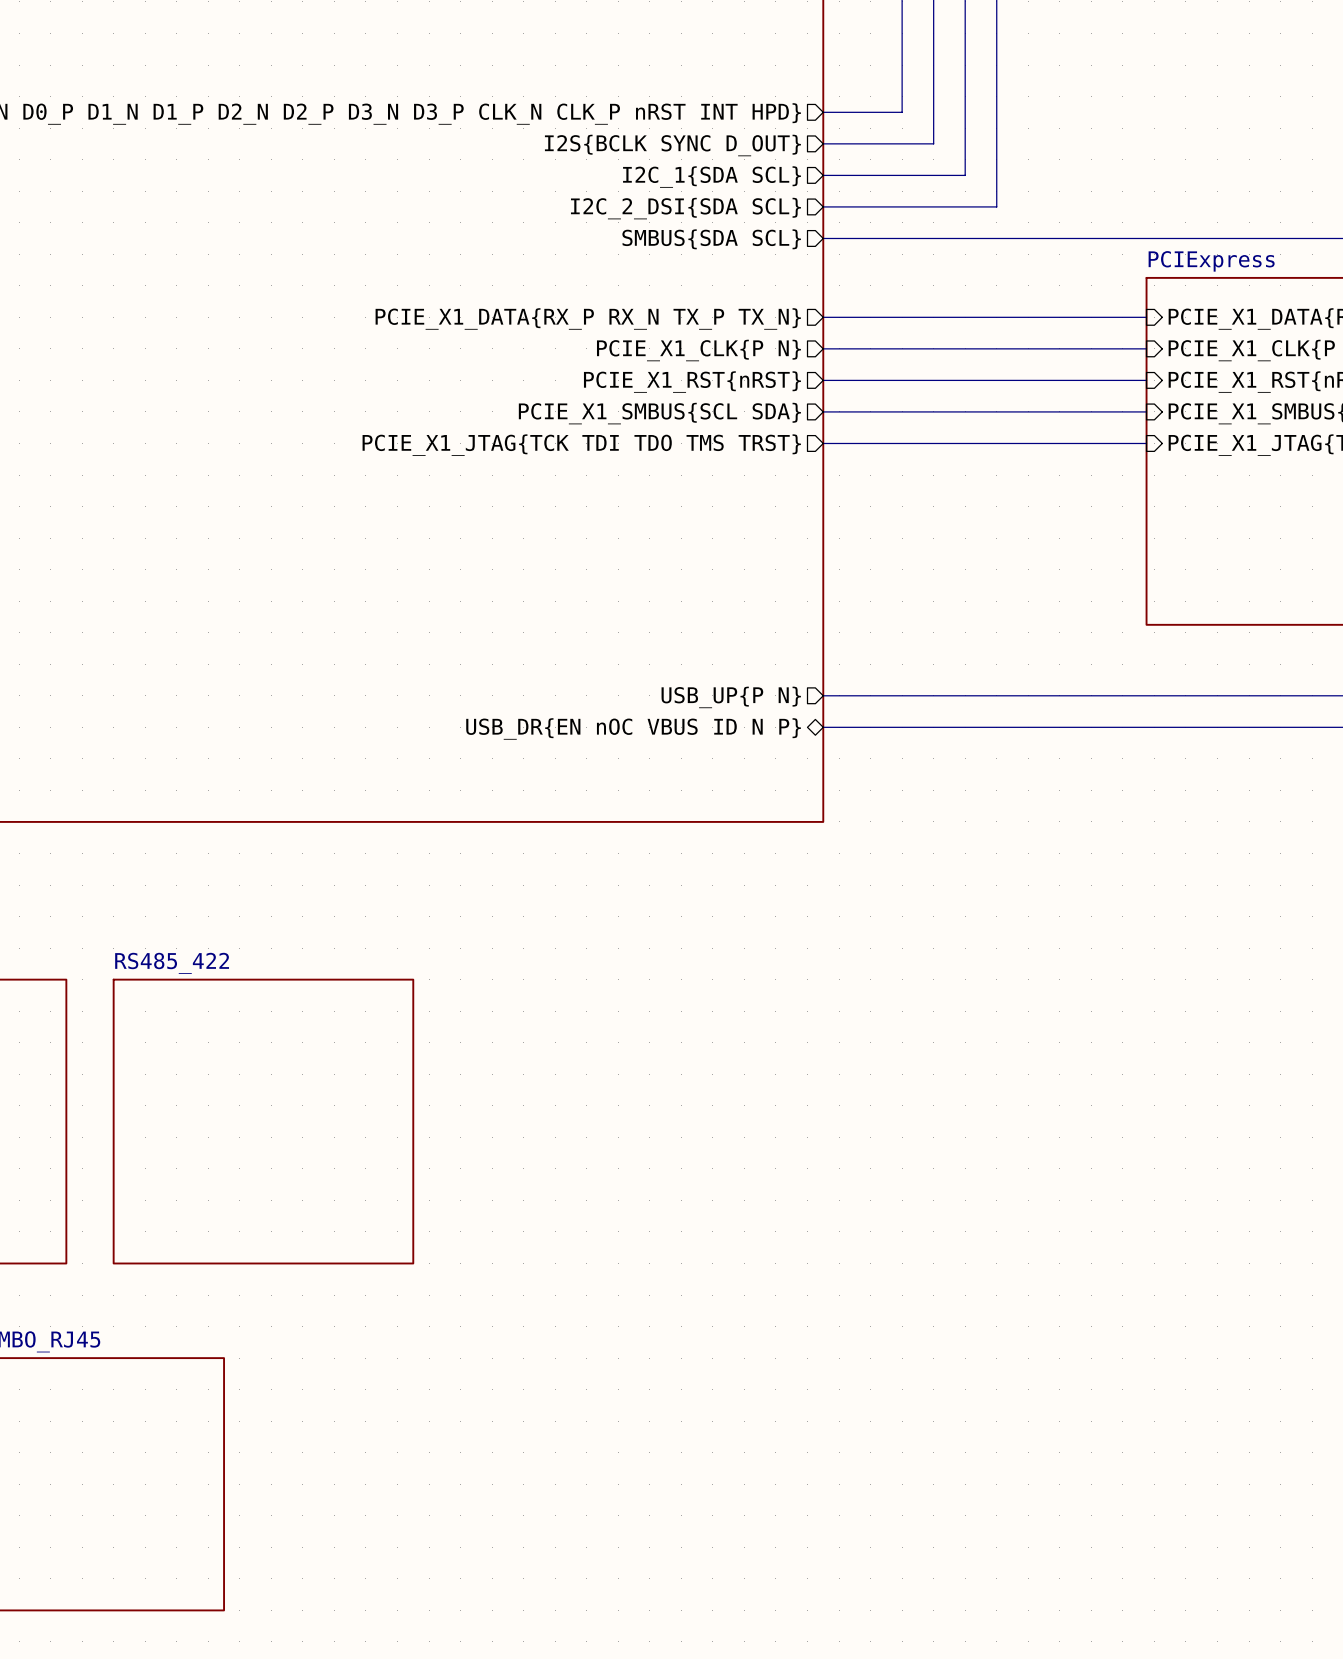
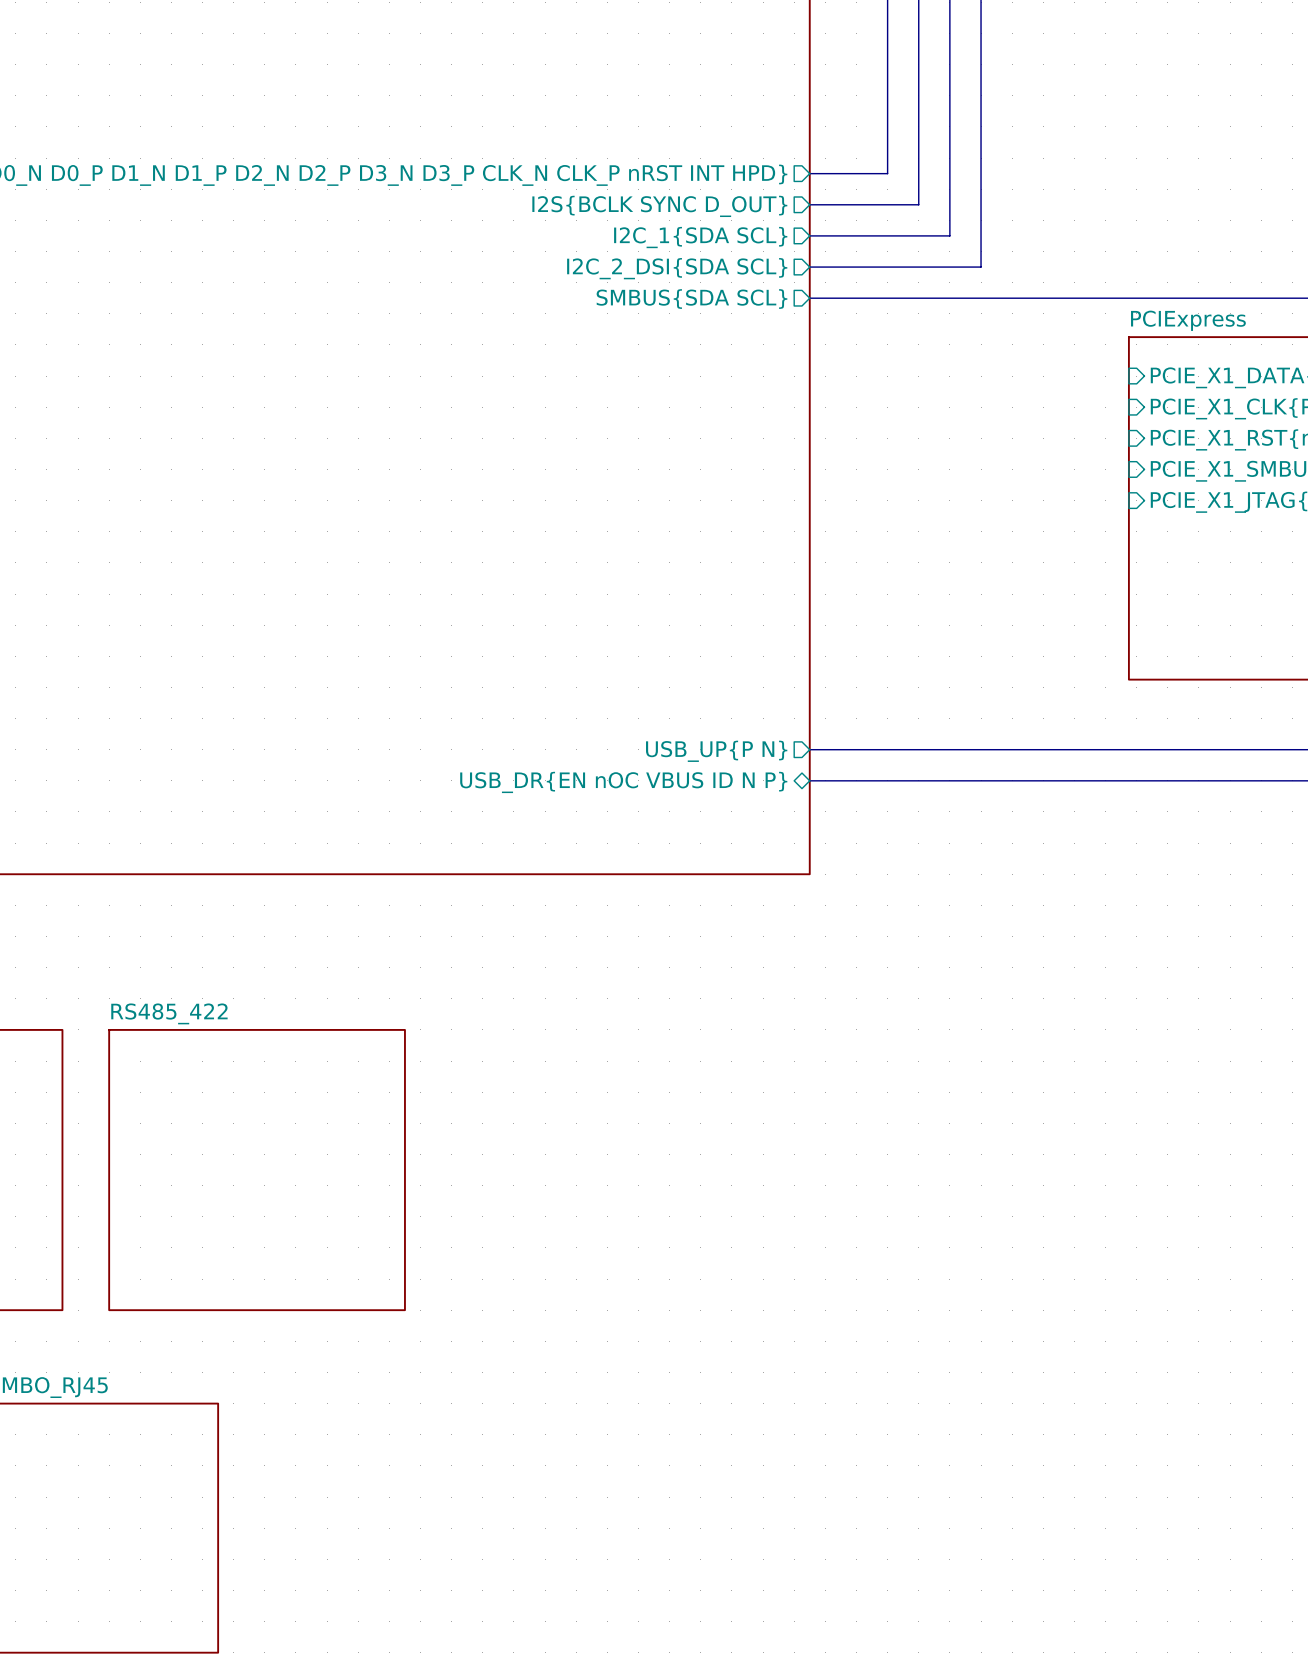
bus: (823, 317) (1146, 317) -> none
sheet pin: PCIE_X1_DATA{RX_P RX_N TX_P TX_N} (588, 318) -> none
bus: (823, 348) (1146, 348) -> none
sheet pin: PCIE_X1_CLK{P N} (698, 350) -> none
bus: (823, 380) (1146, 380) -> none
sheet pin: PCIE_X1_RST{nRST} (692, 382) -> none
bus: (823, 411) (1146, 411) -> none
sheet pin: PCIE_X1_SMBUS{SCL SDA} (659, 413) -> none
bus: (823, 443) (1146, 443) -> none
sheet pin: PCIE_X1_JTAG{TCK TDI TDO TMS TRST} (581, 445) -> none

